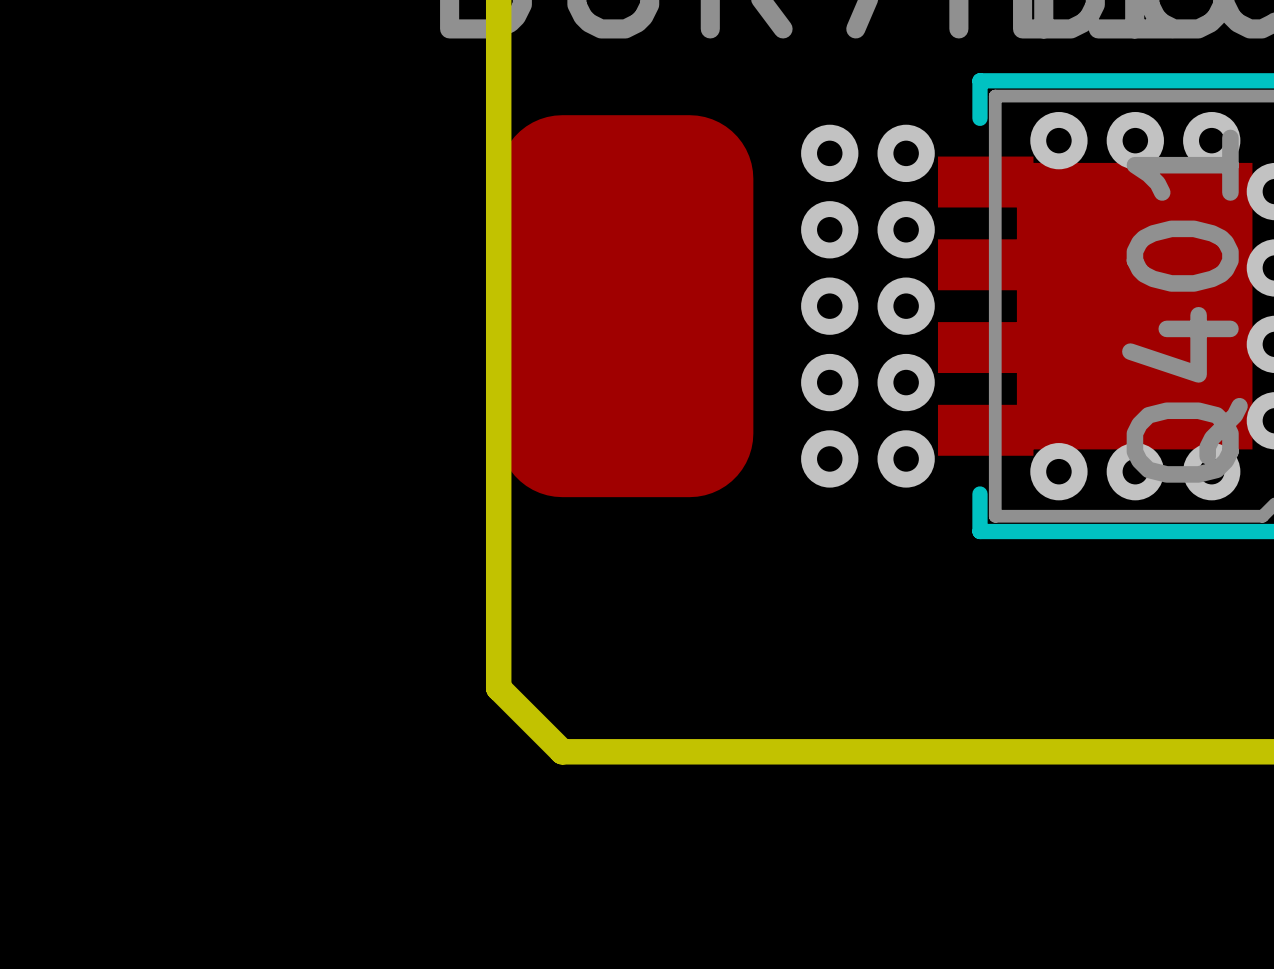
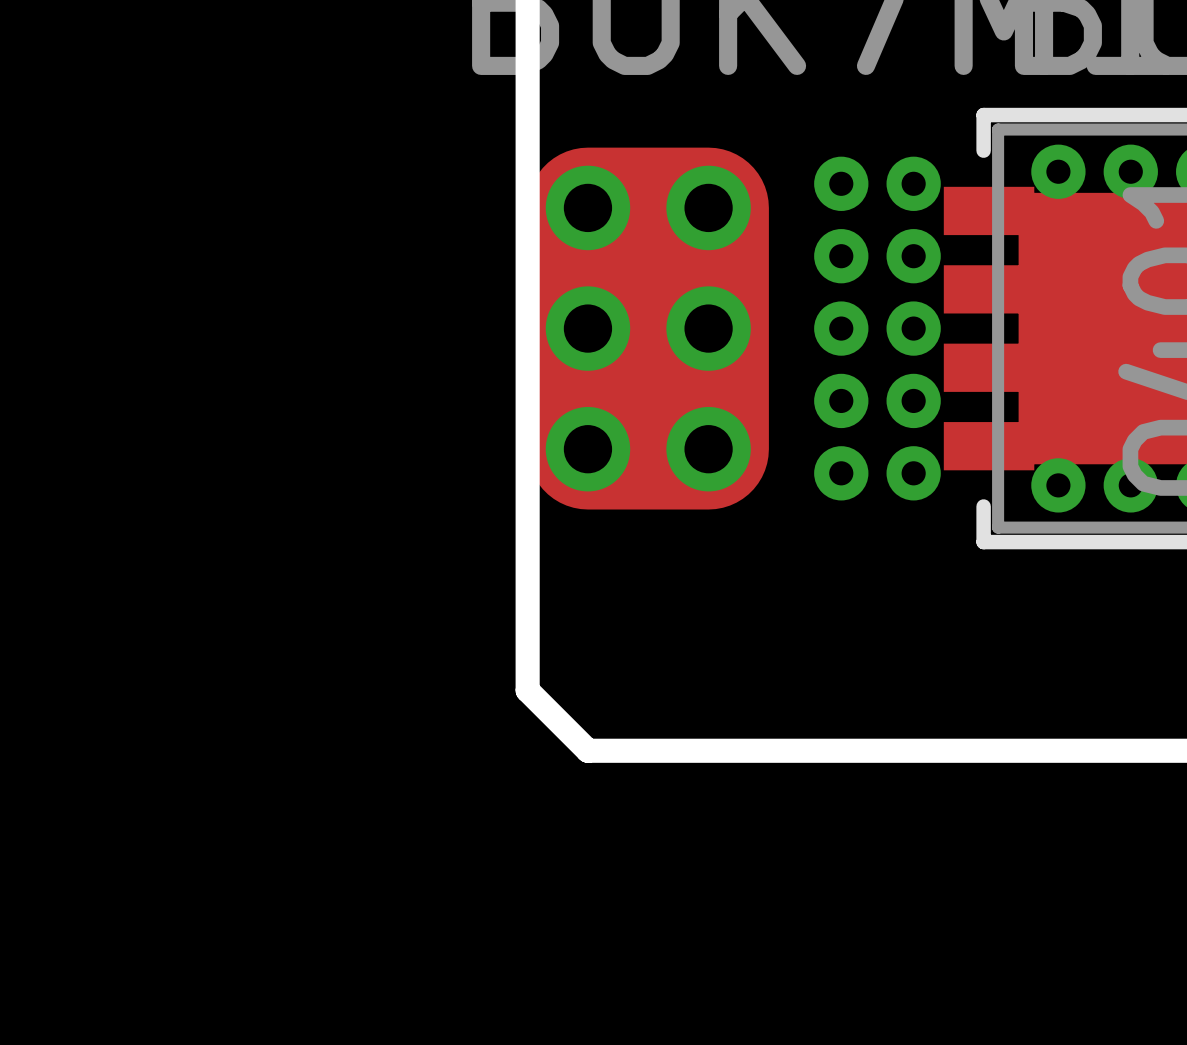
via: none -> (587, 207)
via: none -> (708, 207)
via: none -> (587, 328)
via: none -> (708, 328)
via: none -> (587, 449)
via: none -> (708, 449)

